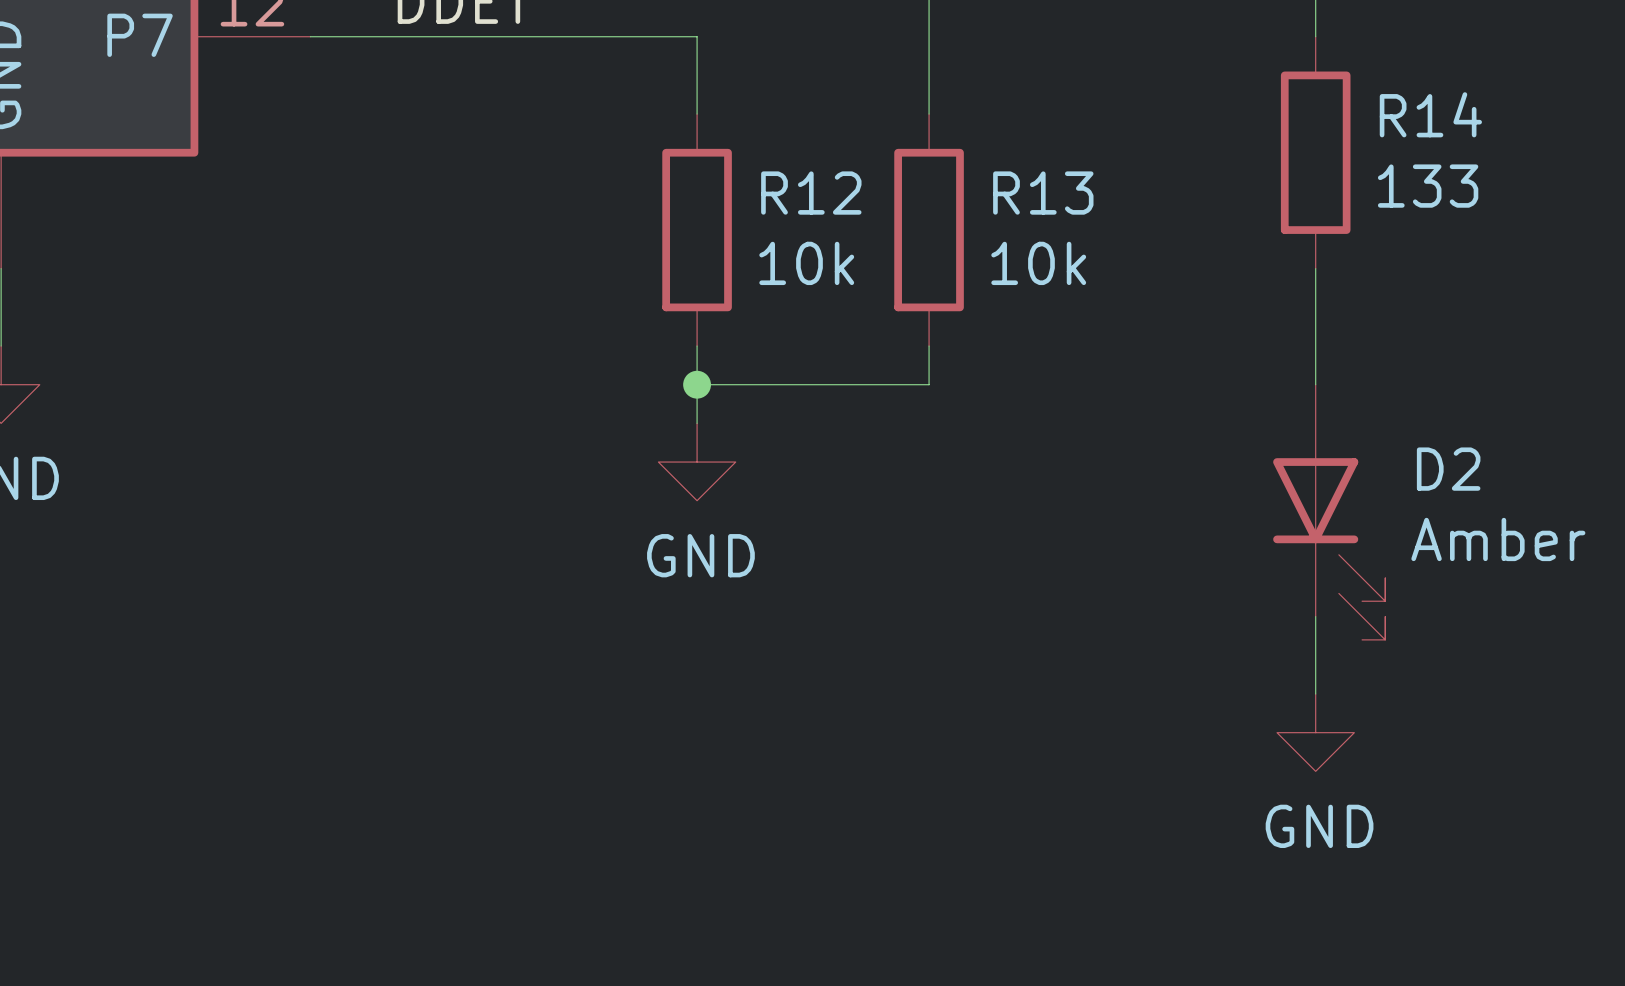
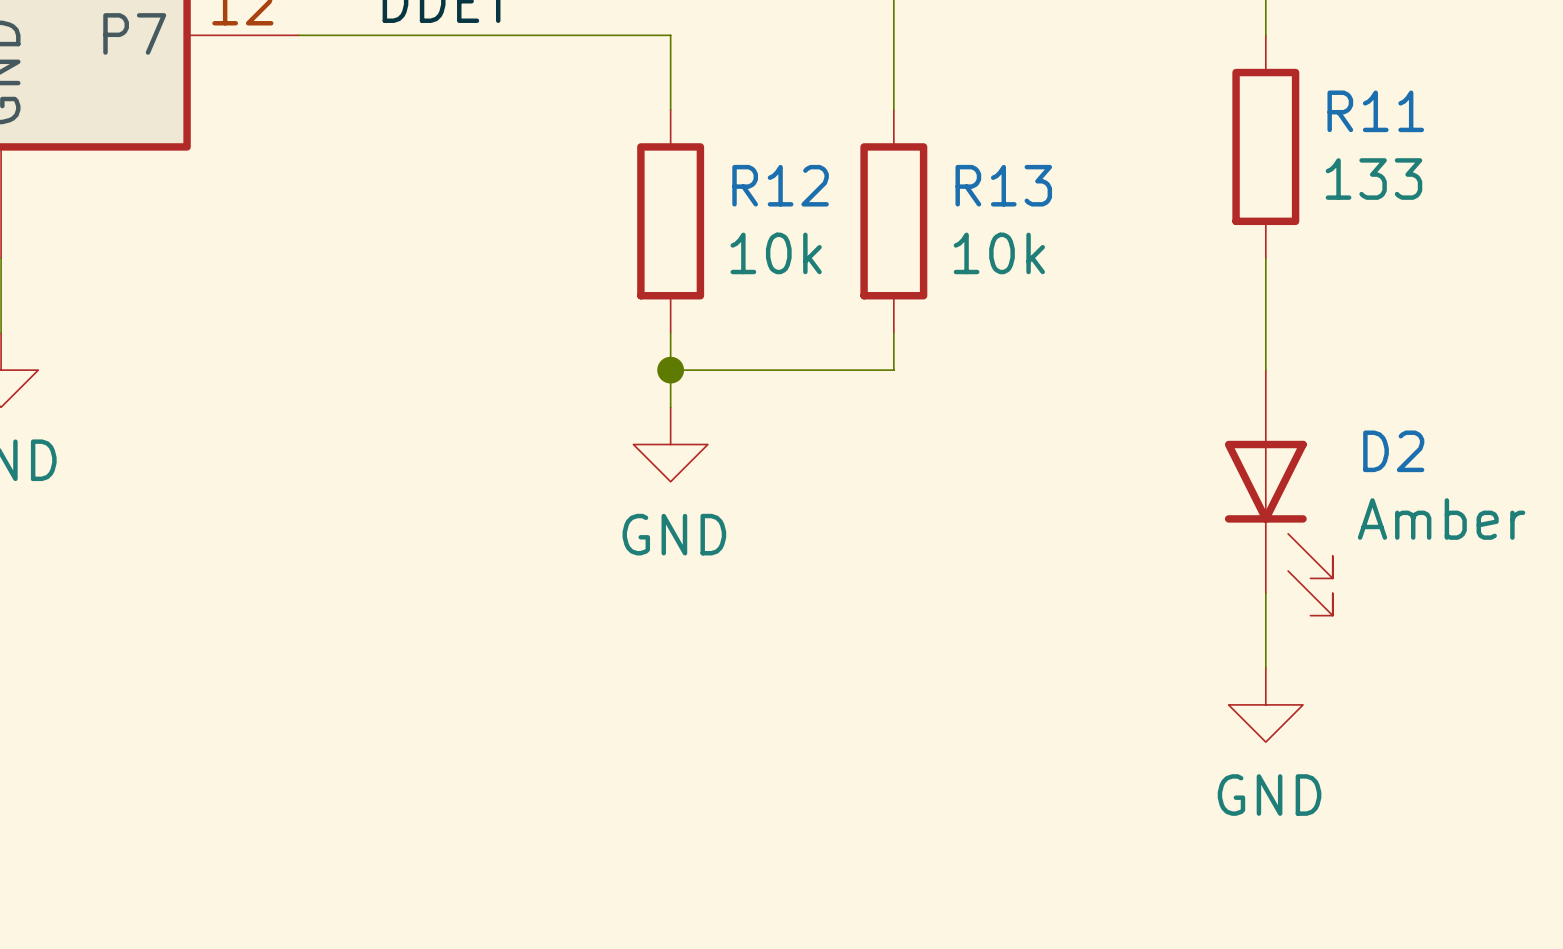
R14 name: R14 (1430, 114) -> R11 (1375, 111)

